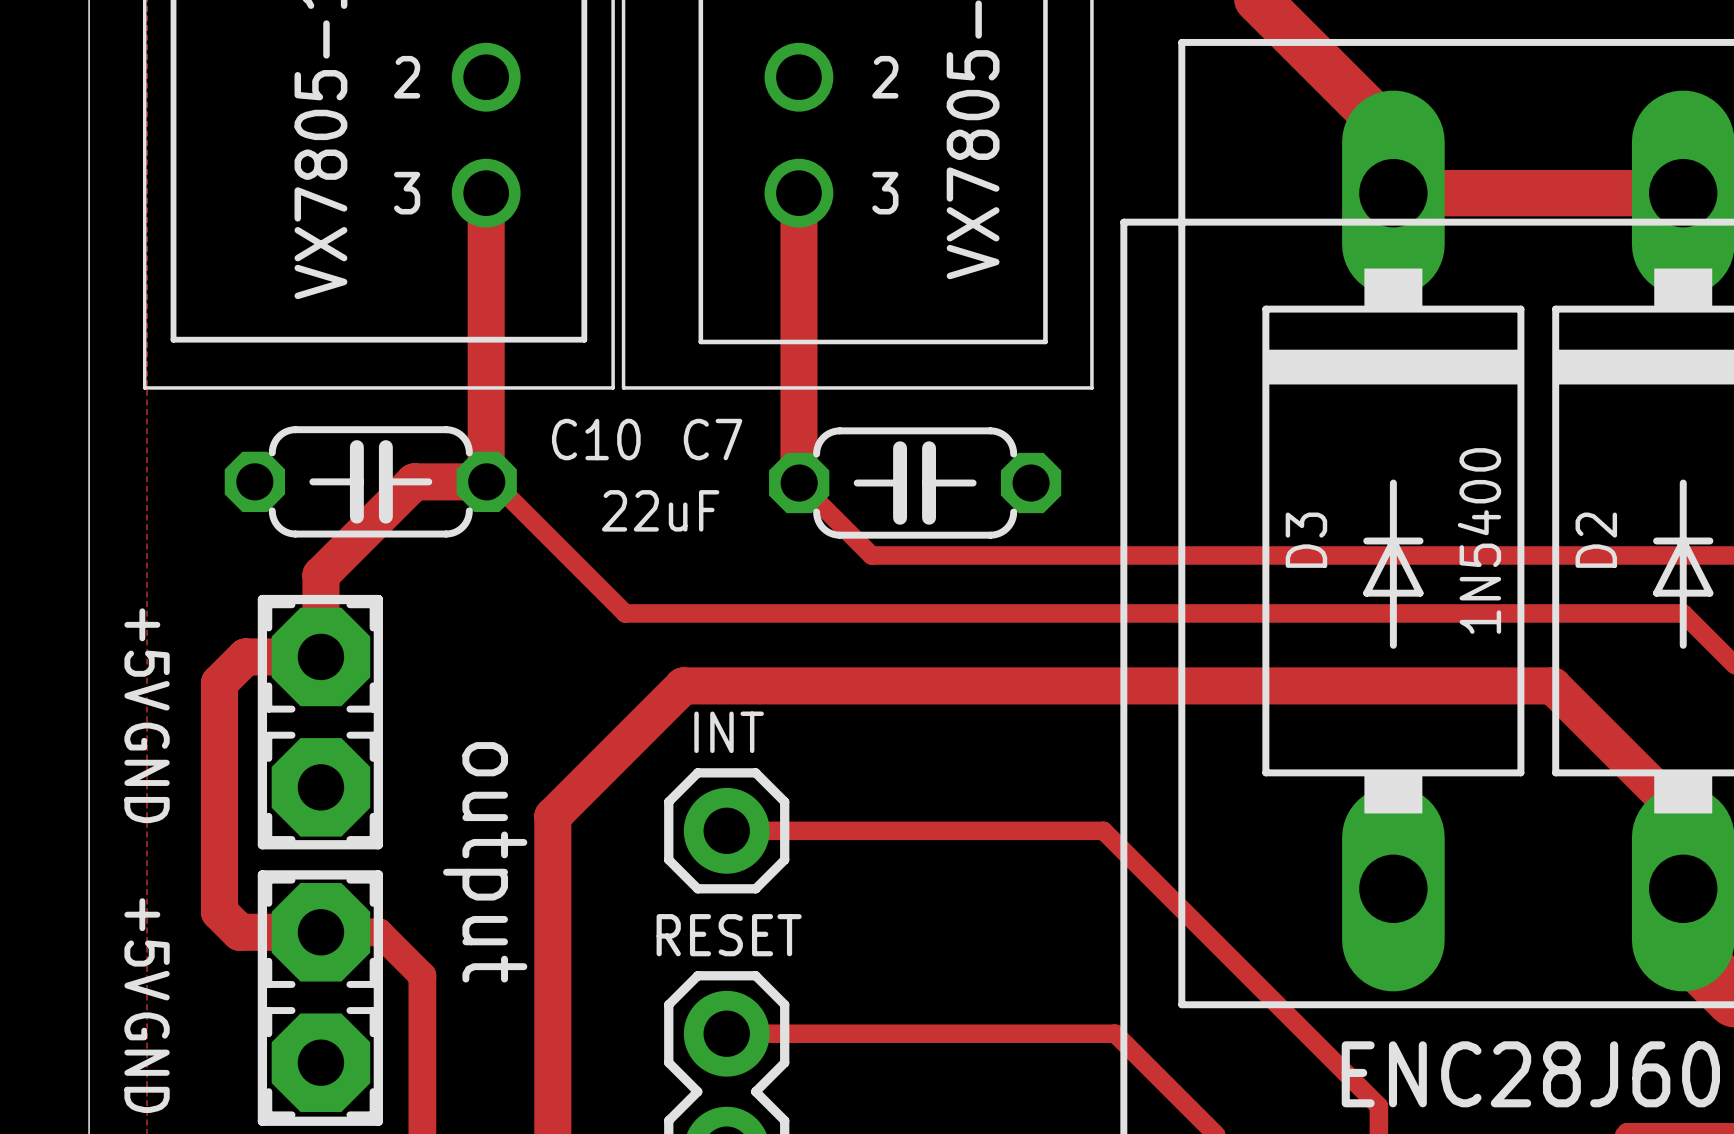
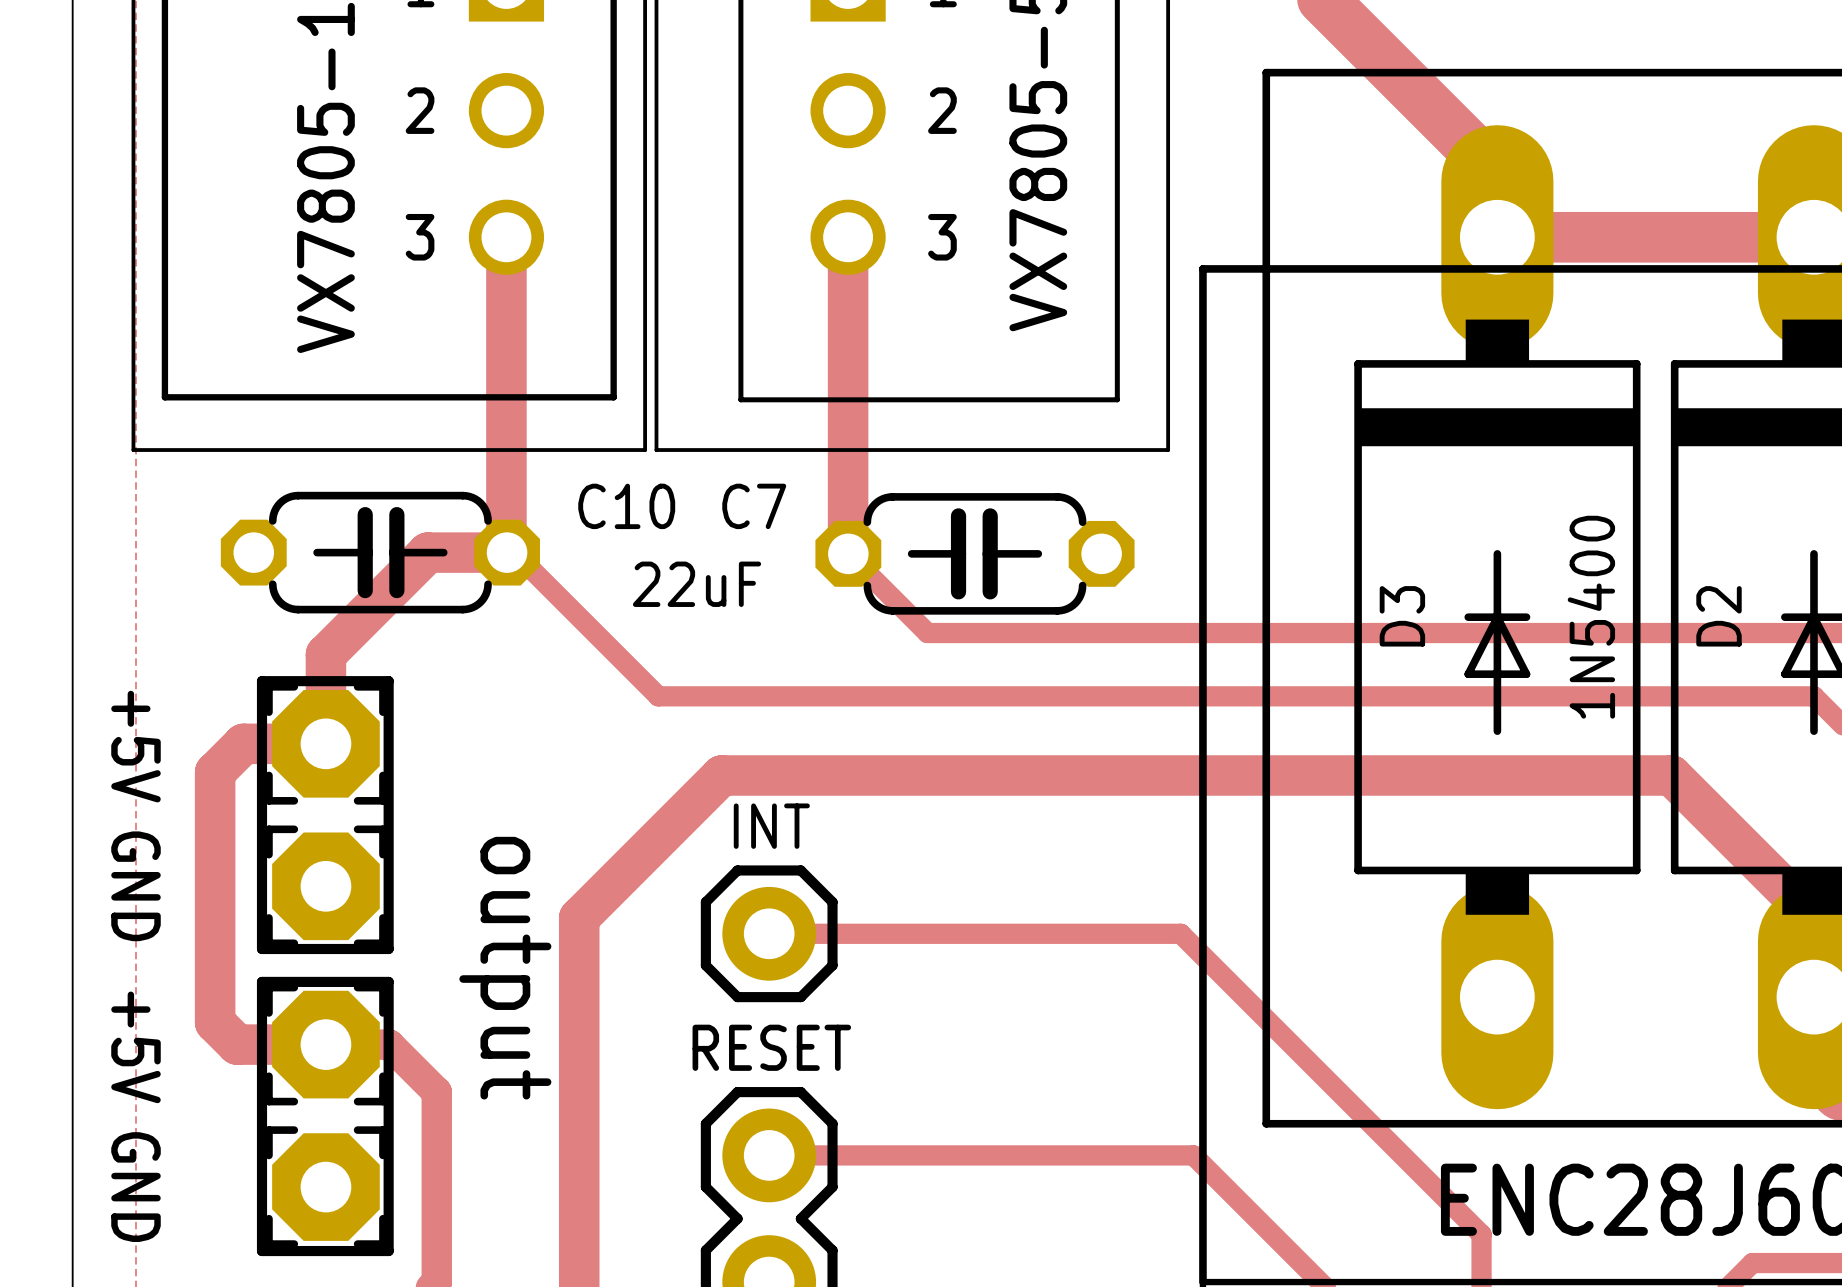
text position: GND (147, 772) -> GND (135, 886)
text position: +5V (147, 949) -> +5V (135, 1047)

